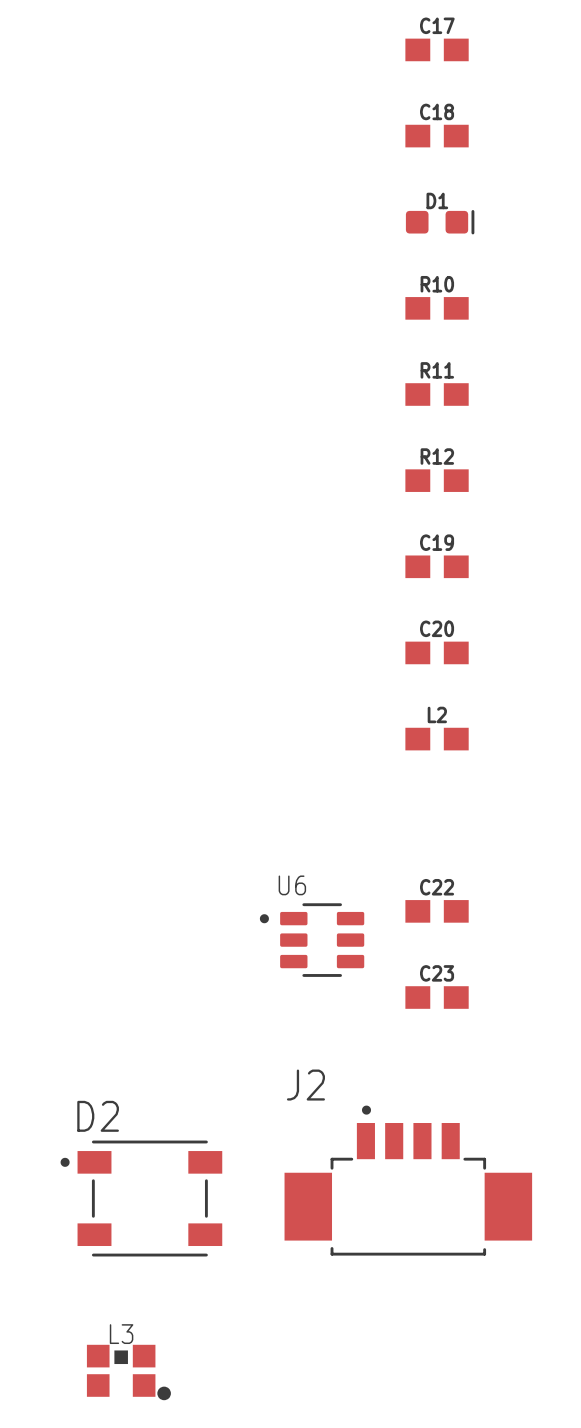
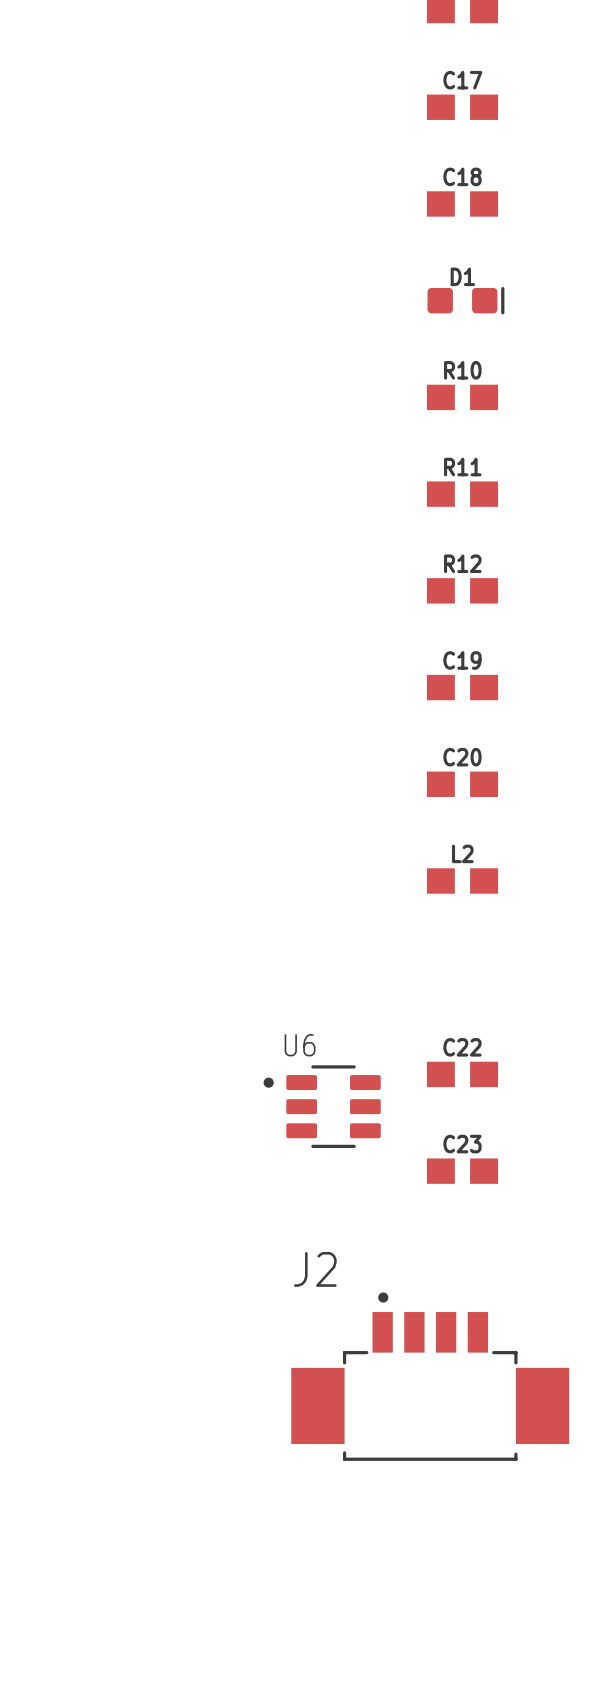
D2: (141, 1198) -> none
L3: (128, 1372) -> none

